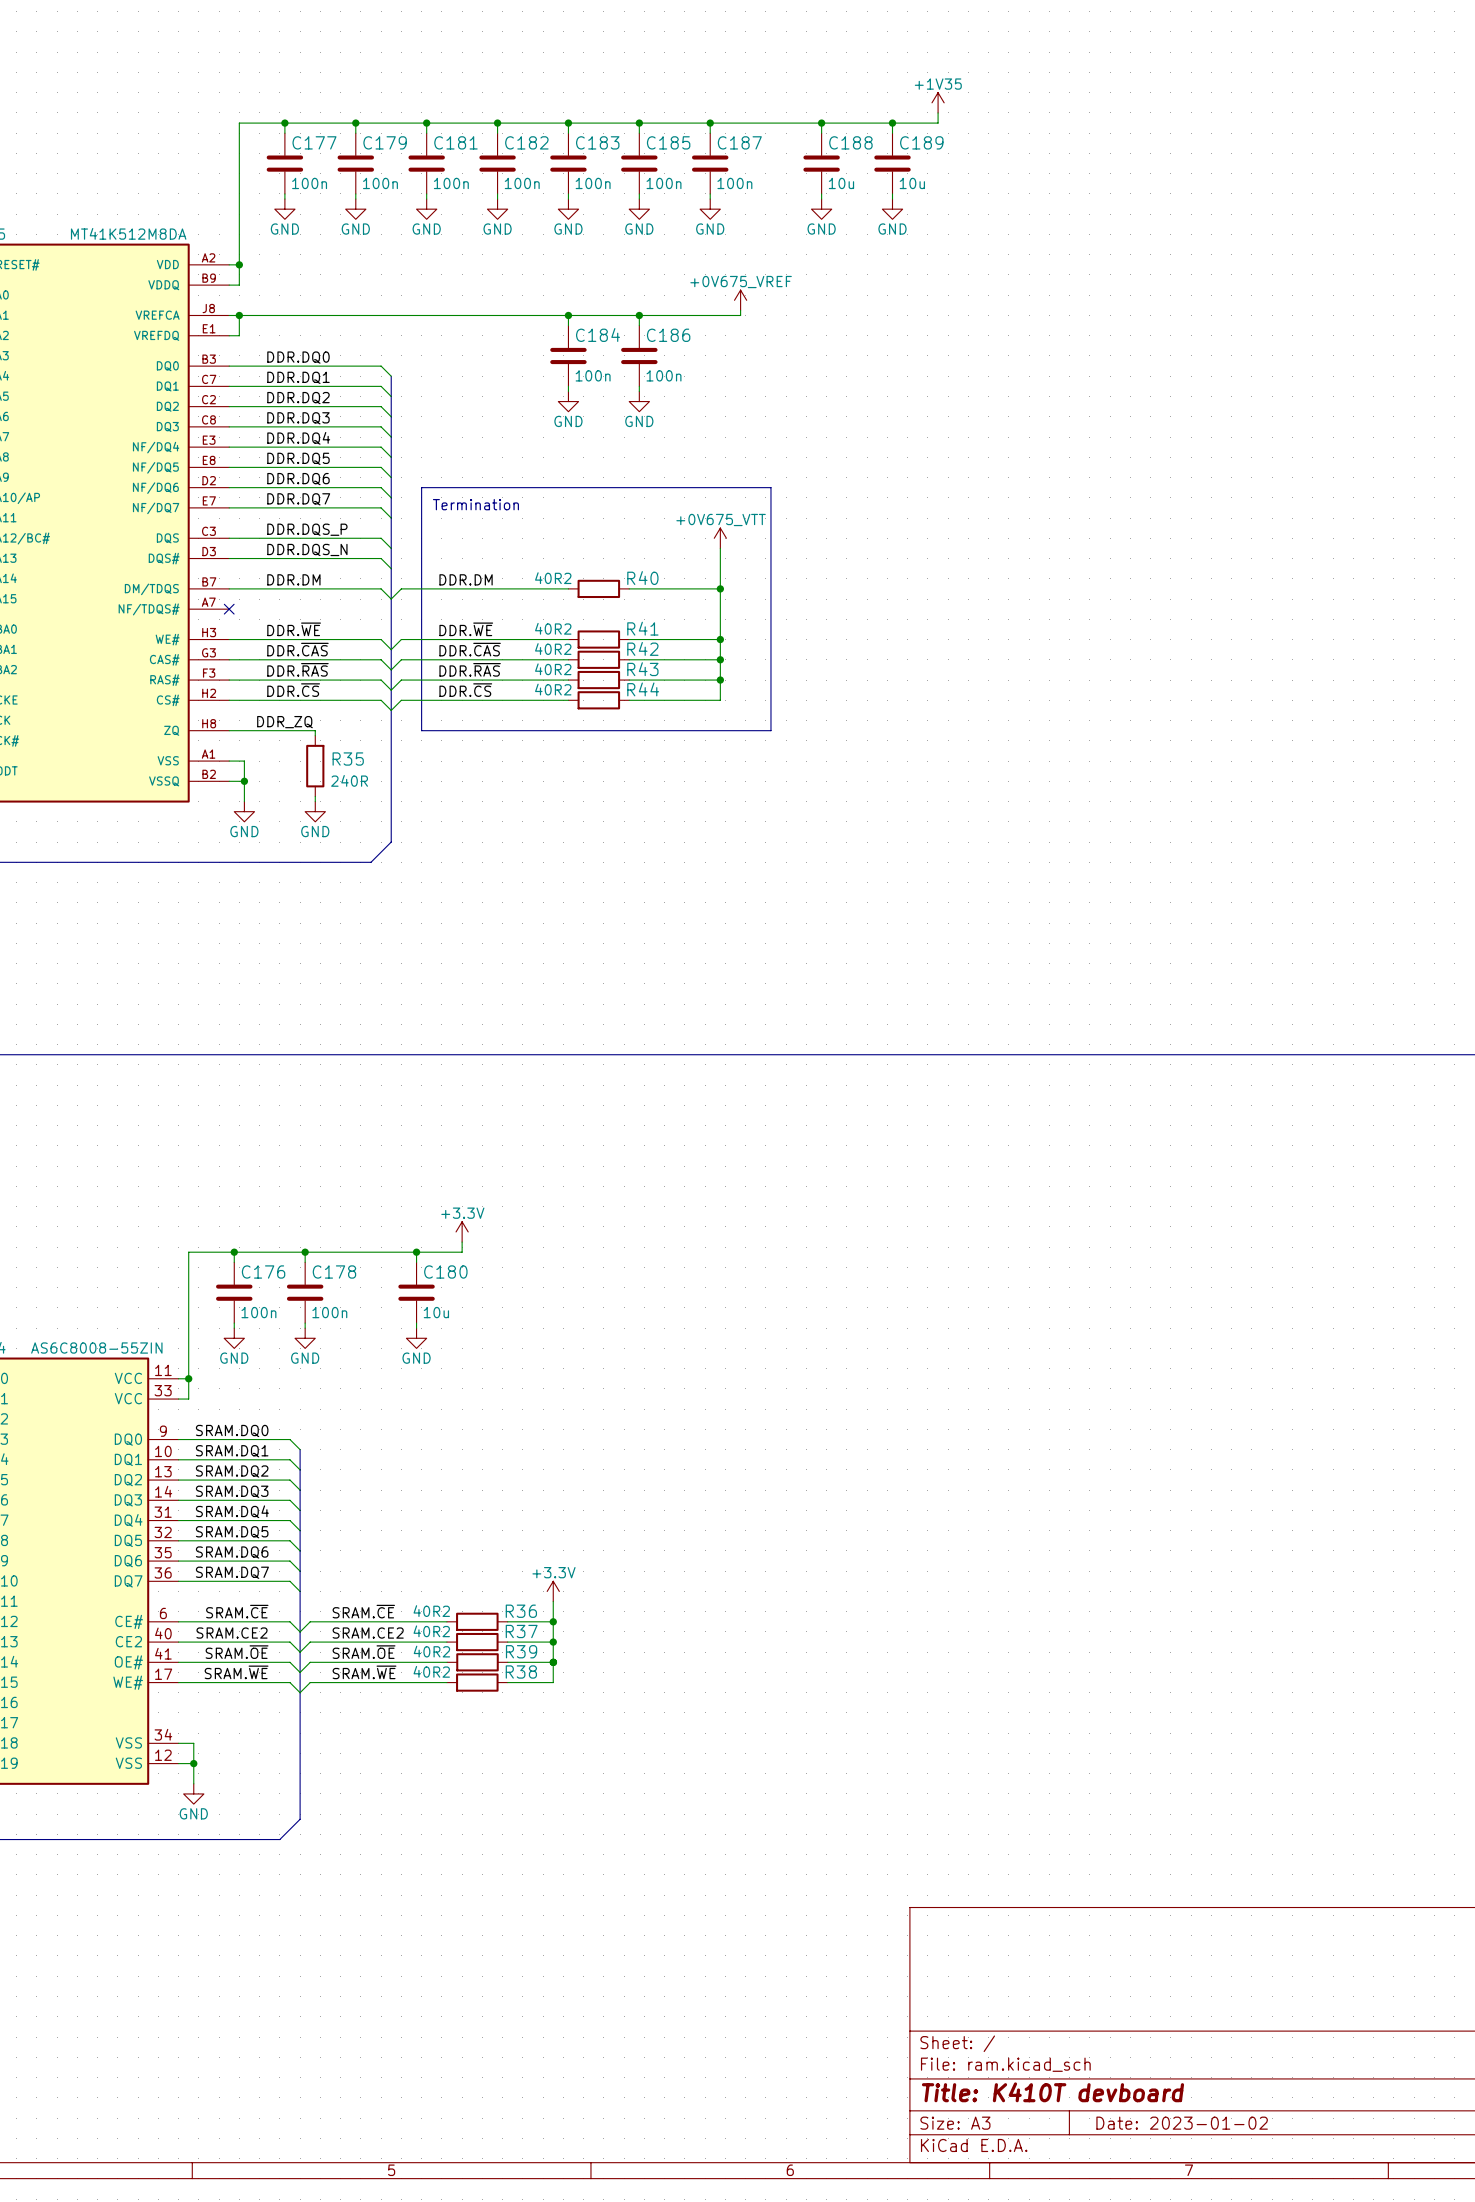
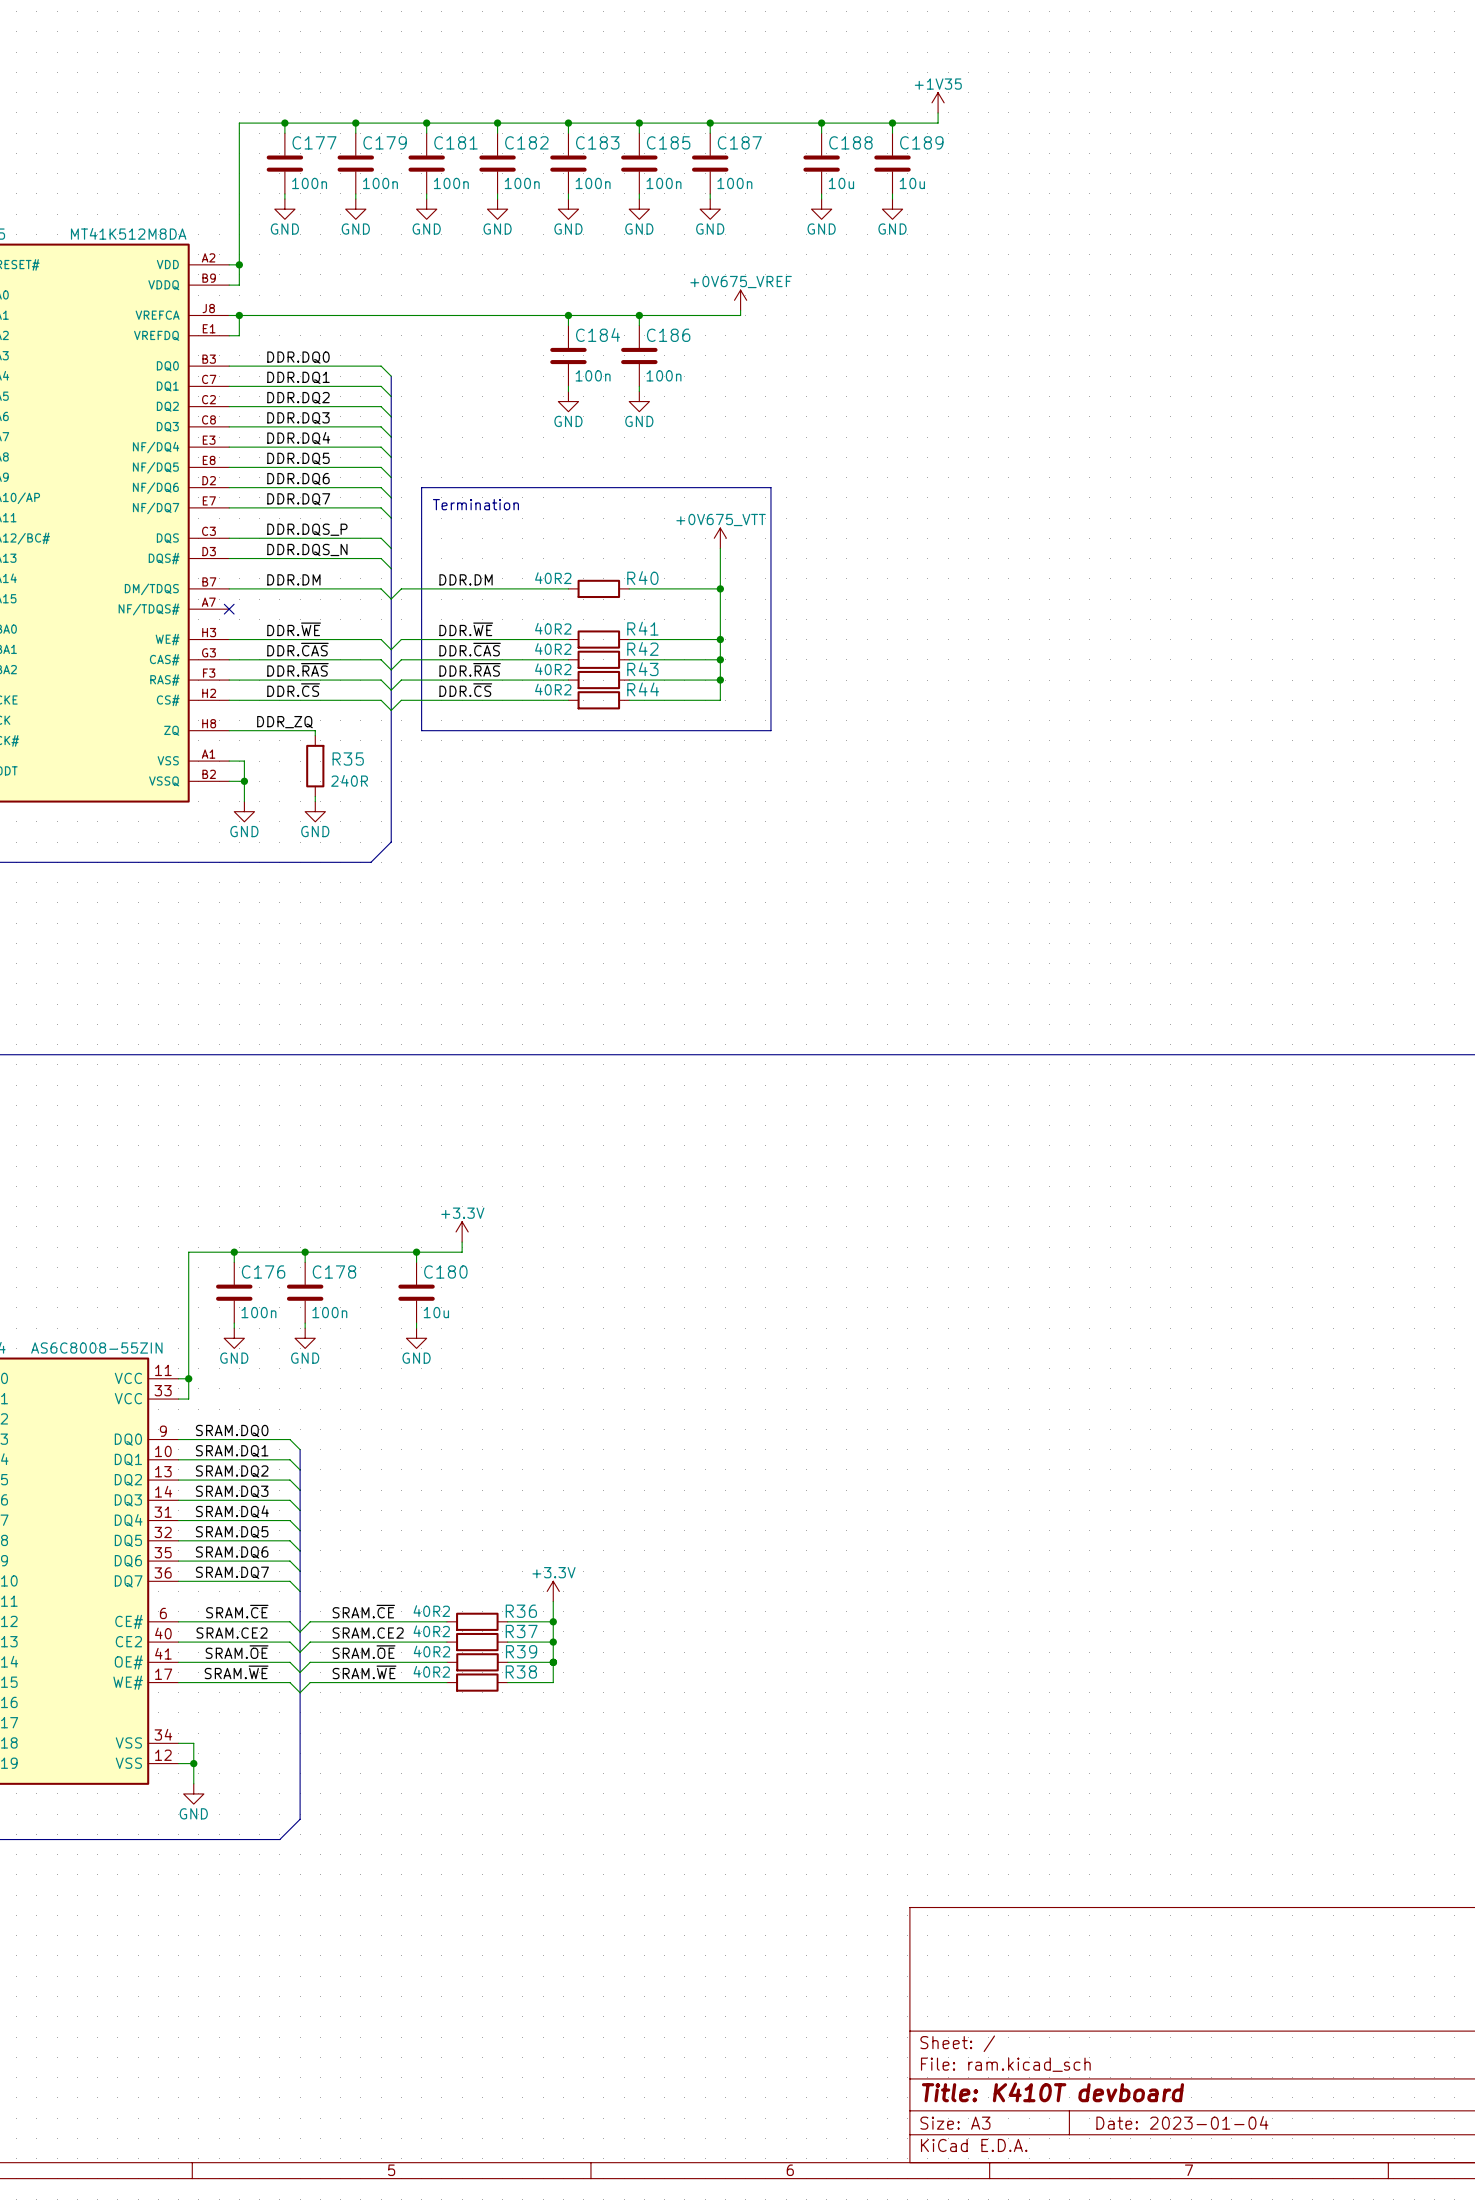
title block: Date: 2023-01-02 (1182, 2123) -> Date: 2023-01-04 (1182, 2122)

